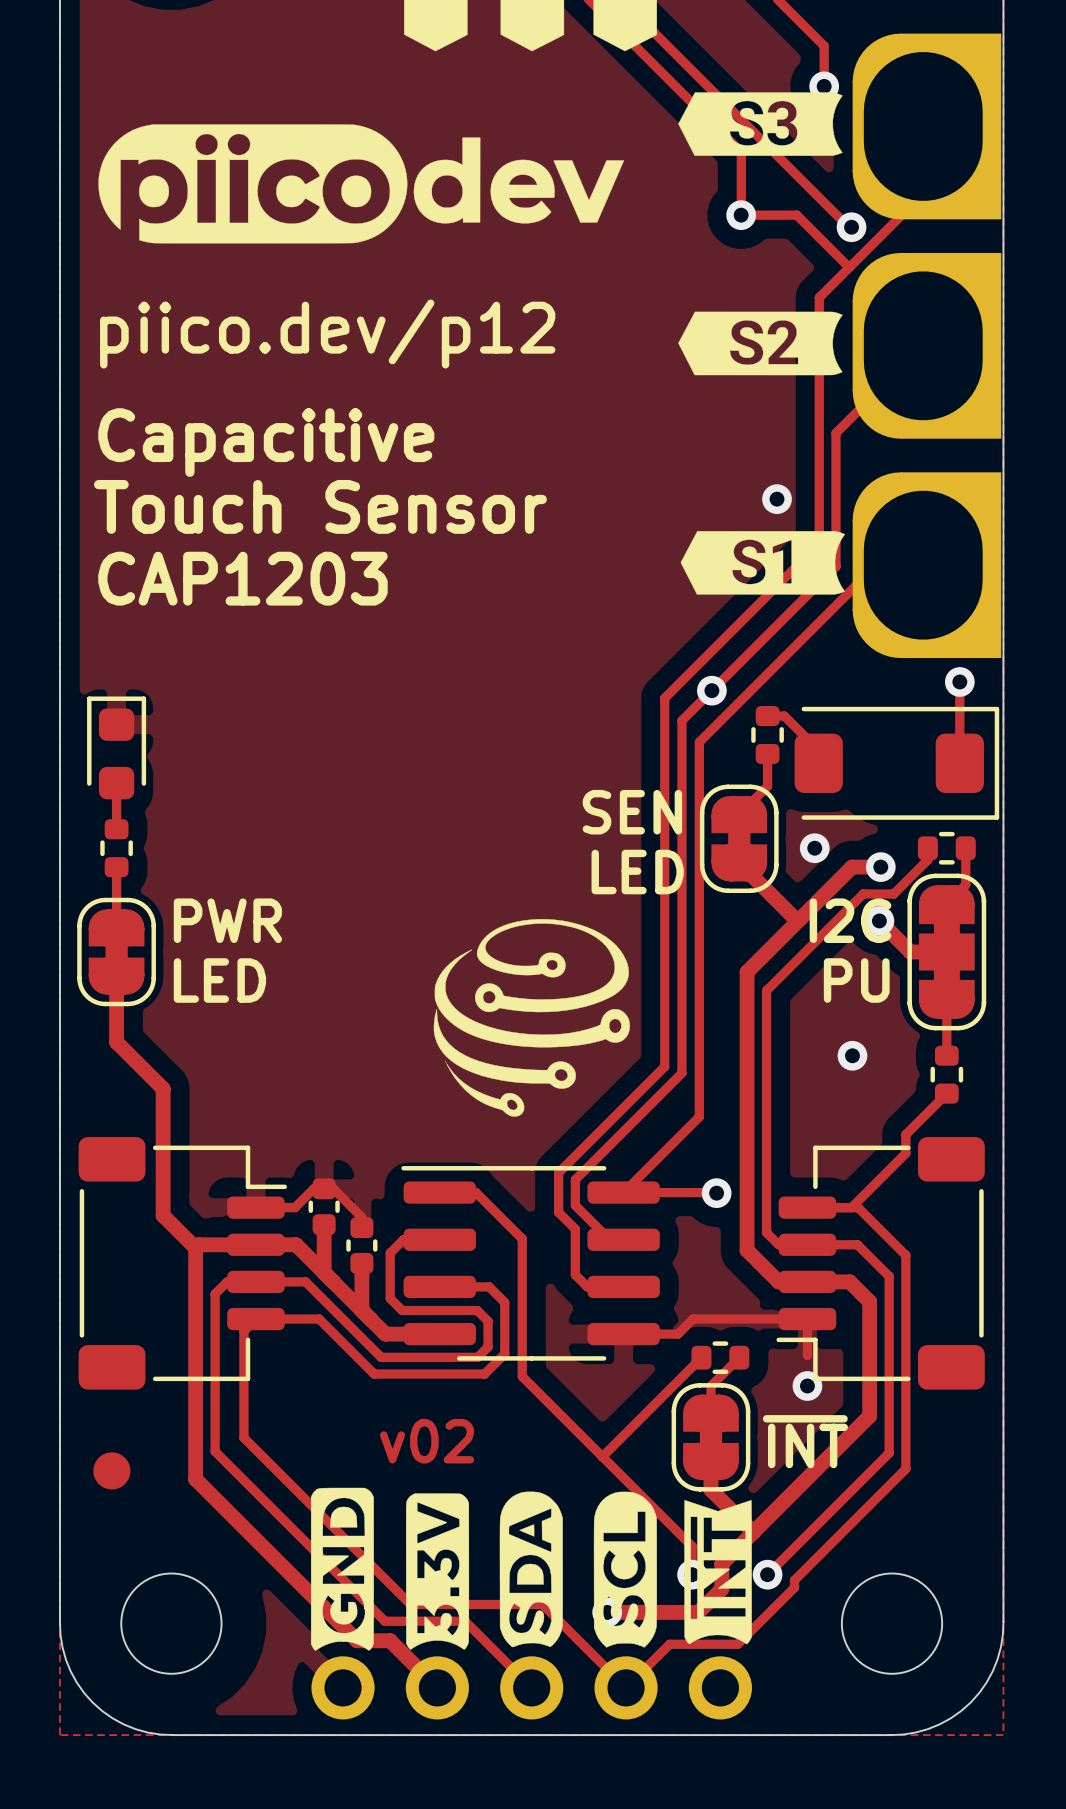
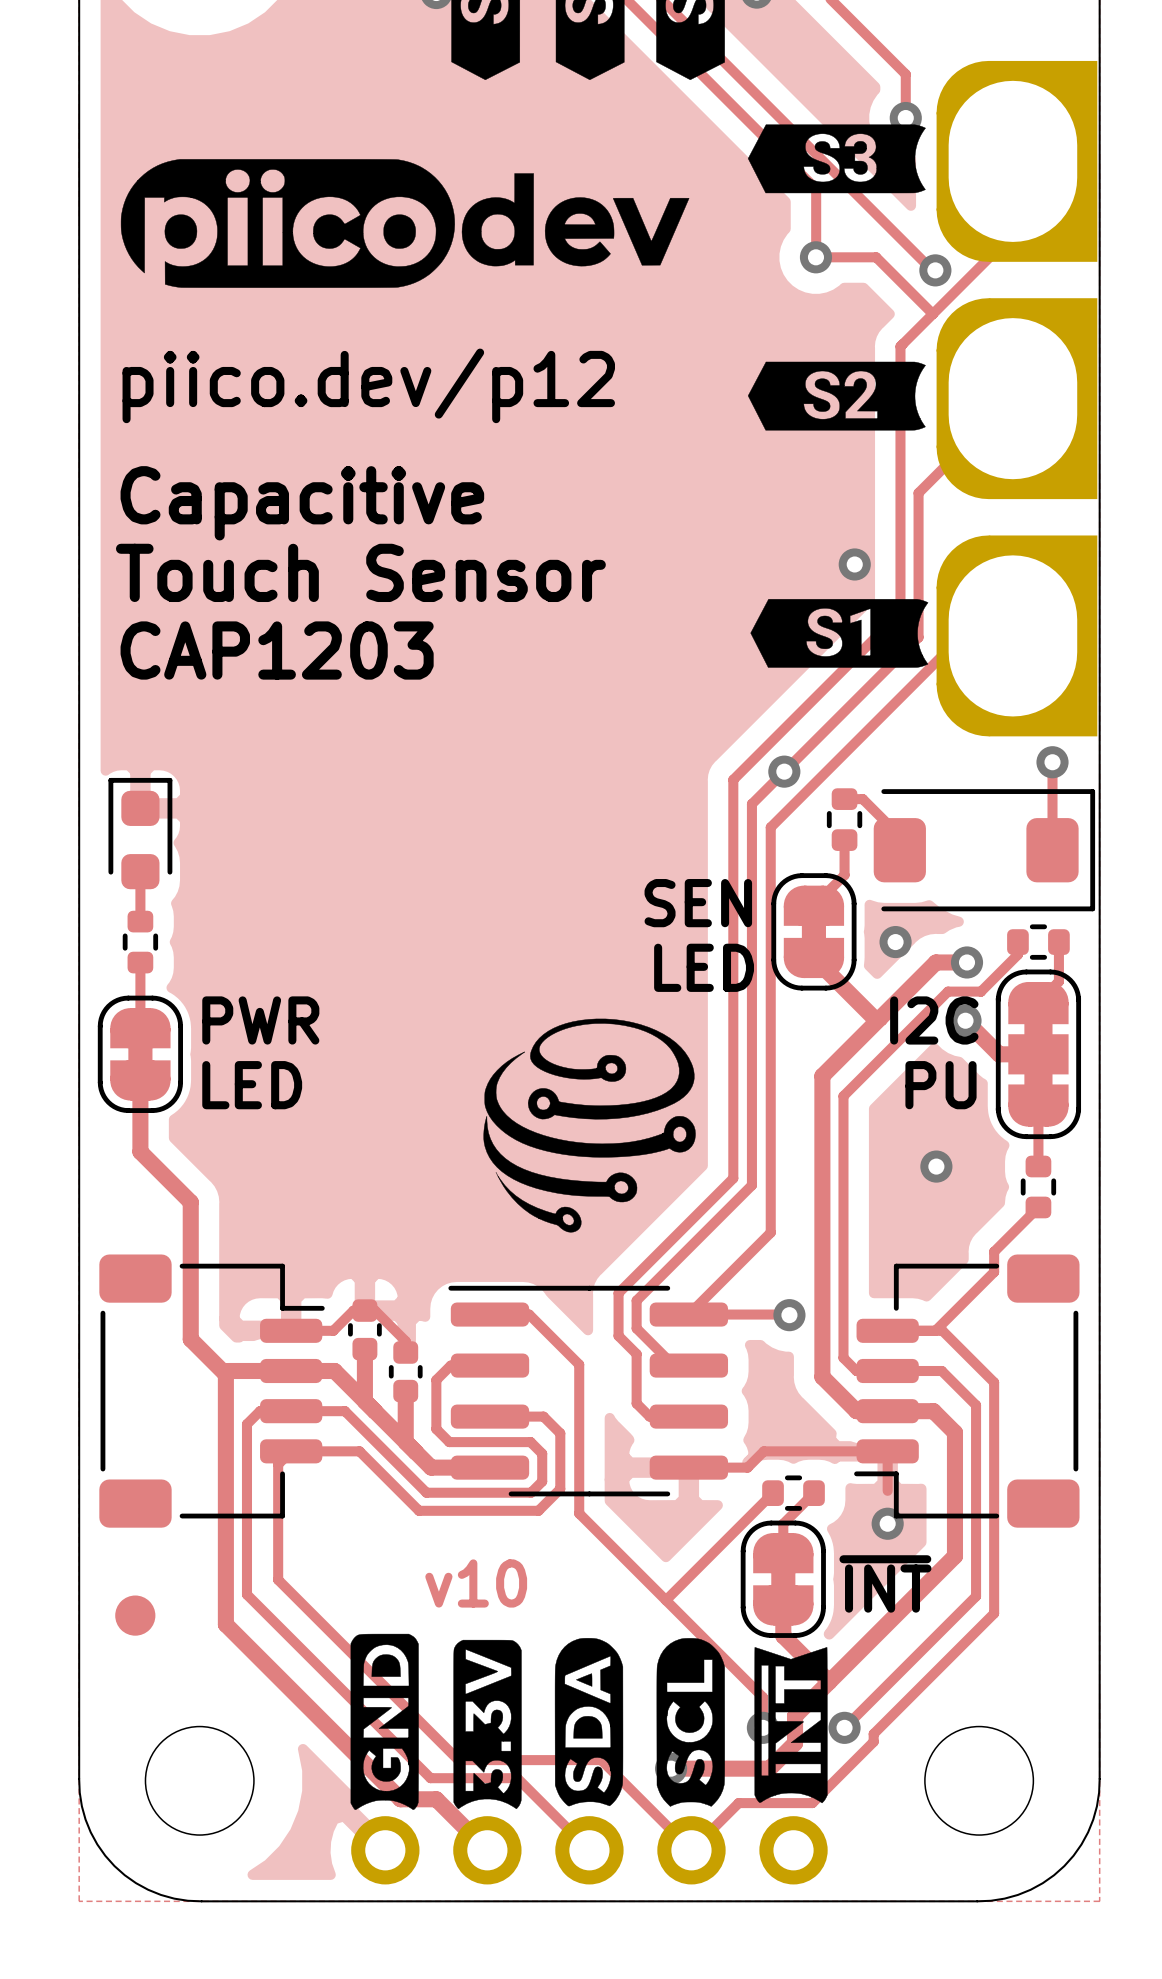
text: v02 (427, 1441) -> v10 (476, 1583)

